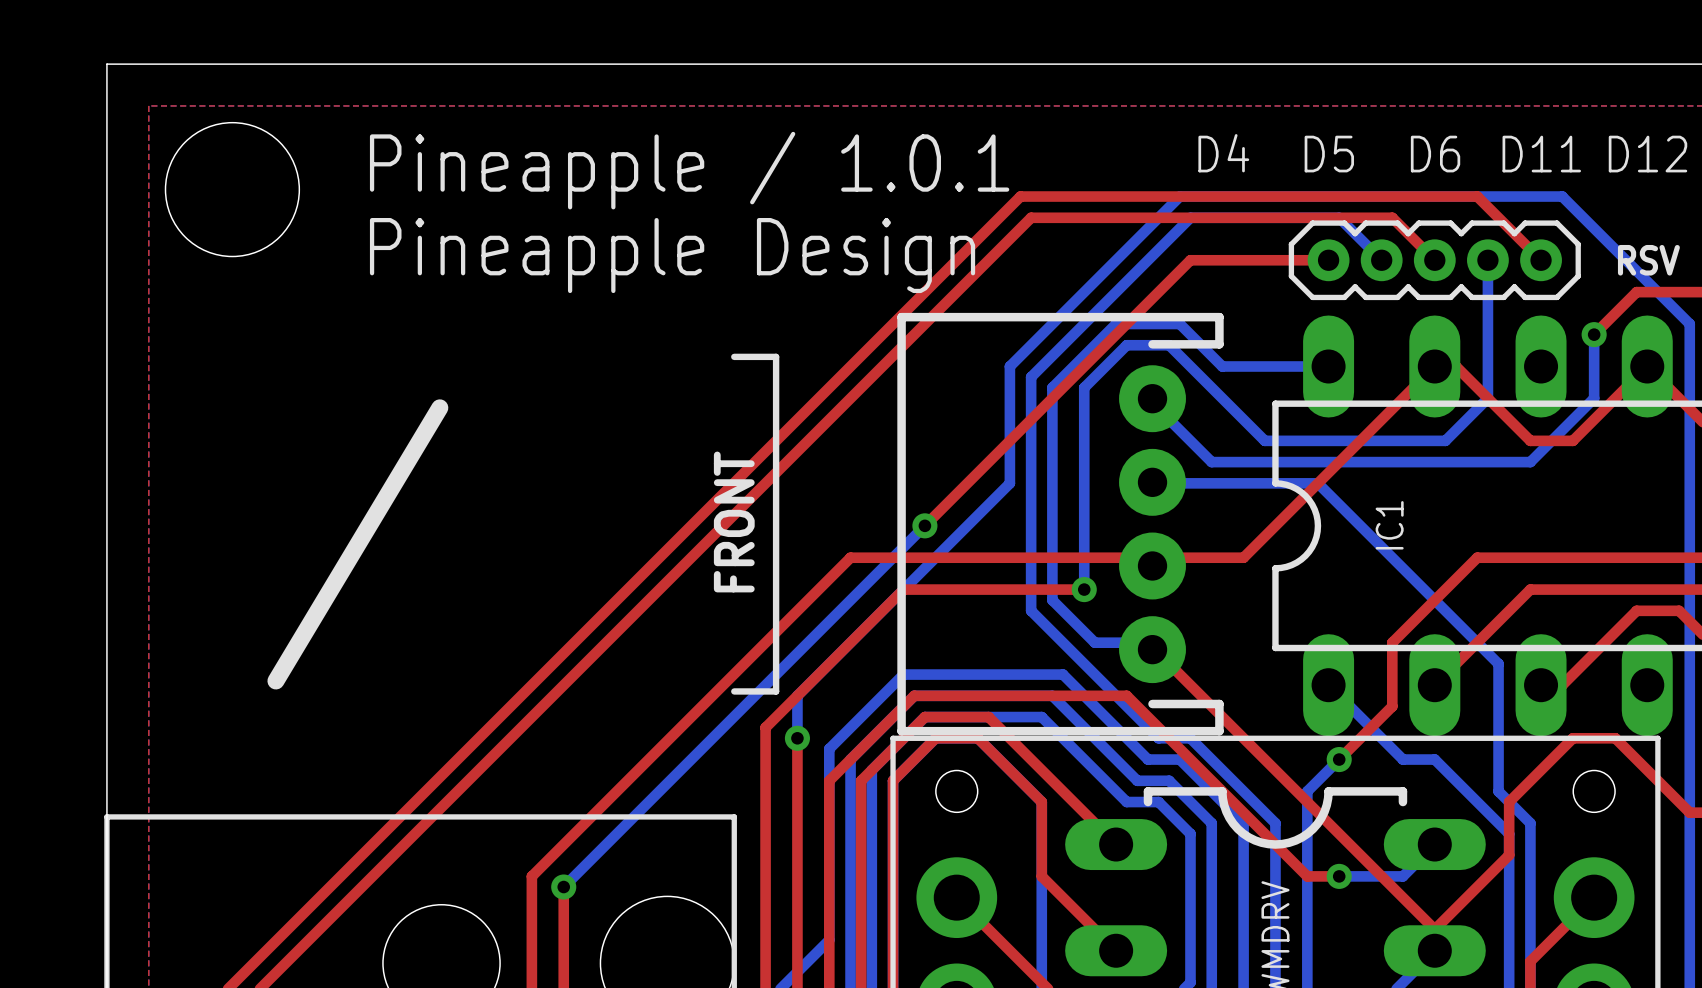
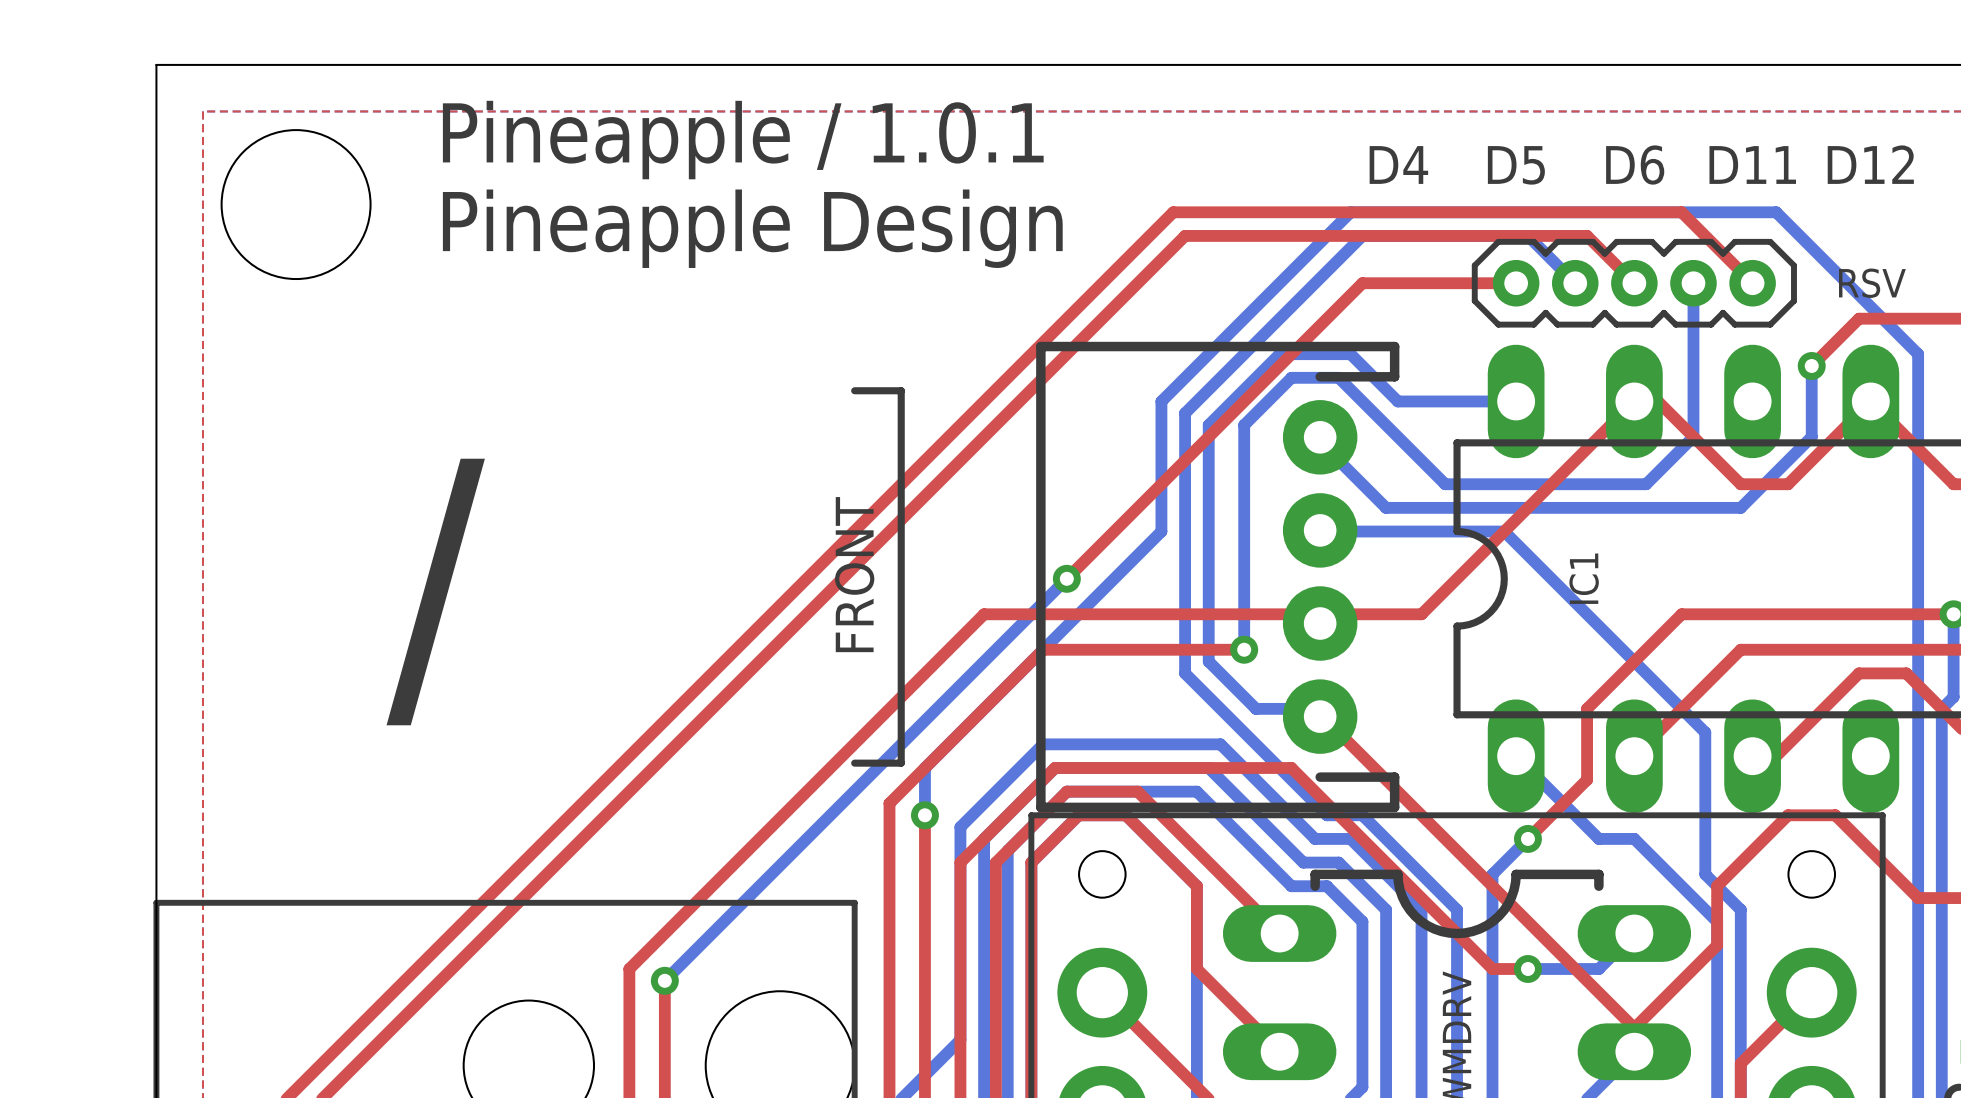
text position: Pineapple / 1.0.1 (689, 170) -> Pineapple / 1.0.1 (743, 140)
text position: Pineapple Design (672, 255) -> Pineapple Design (752, 228)

